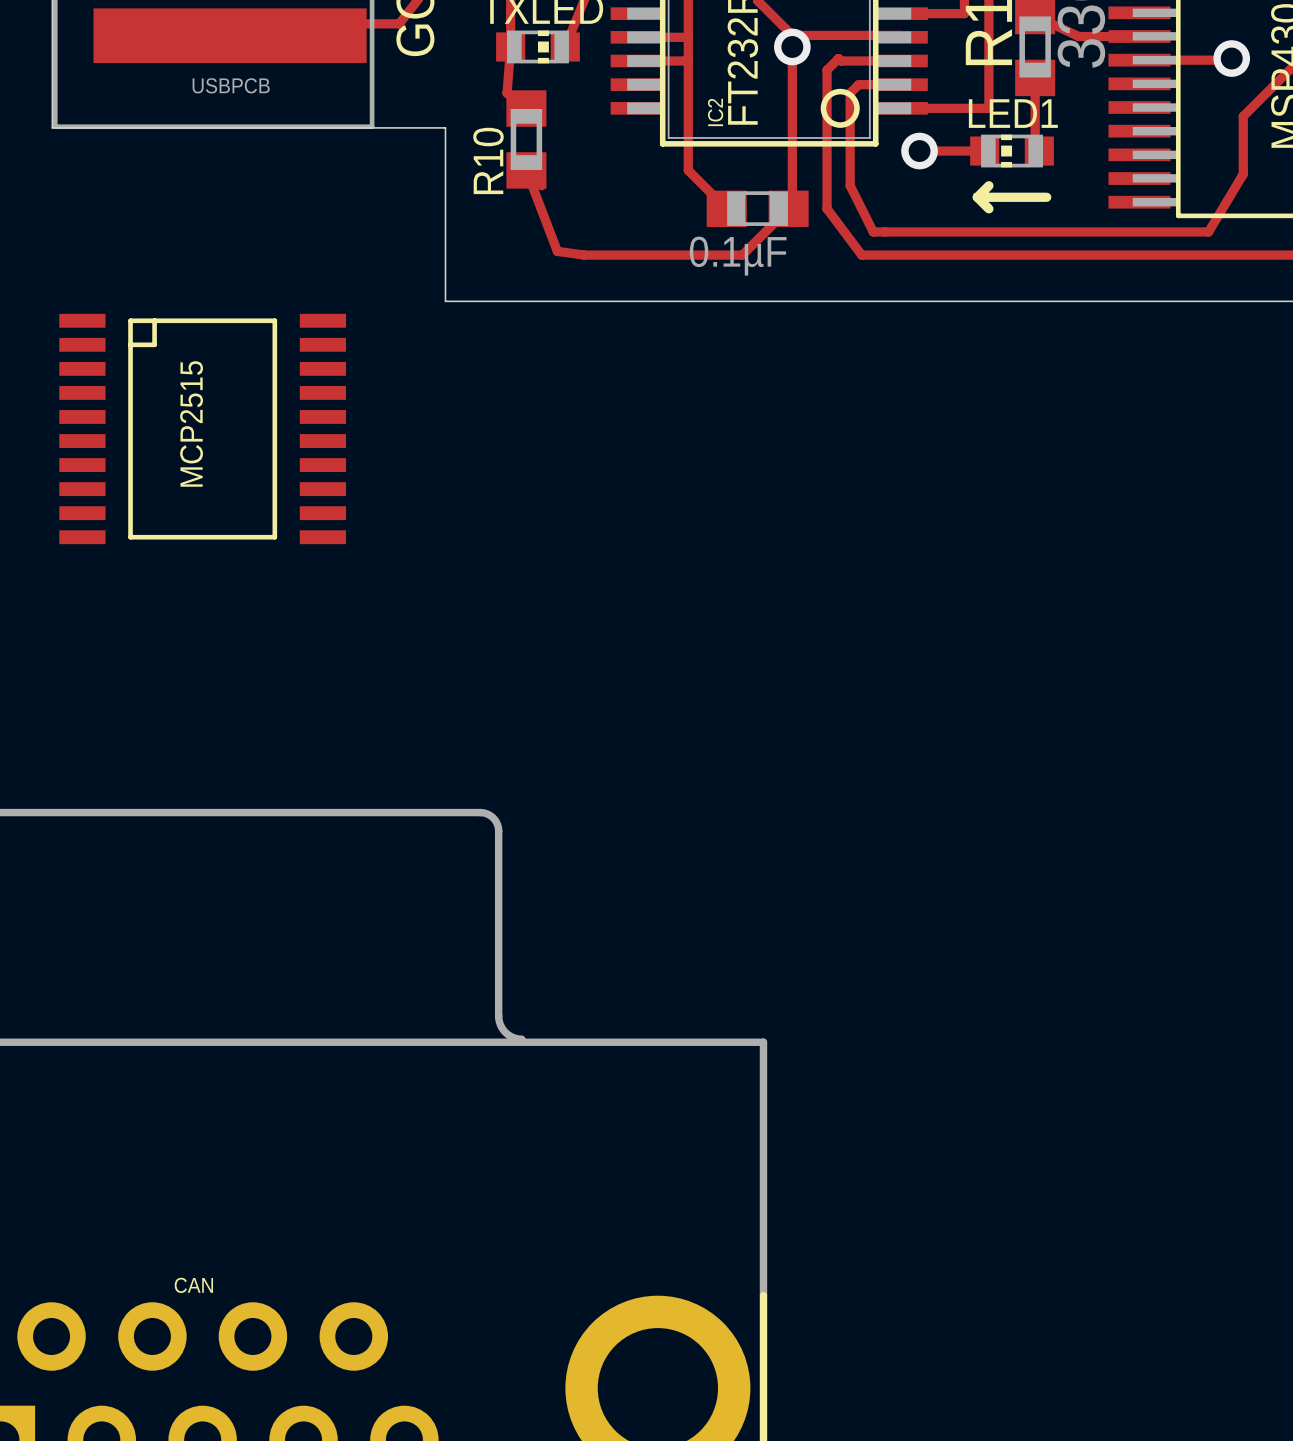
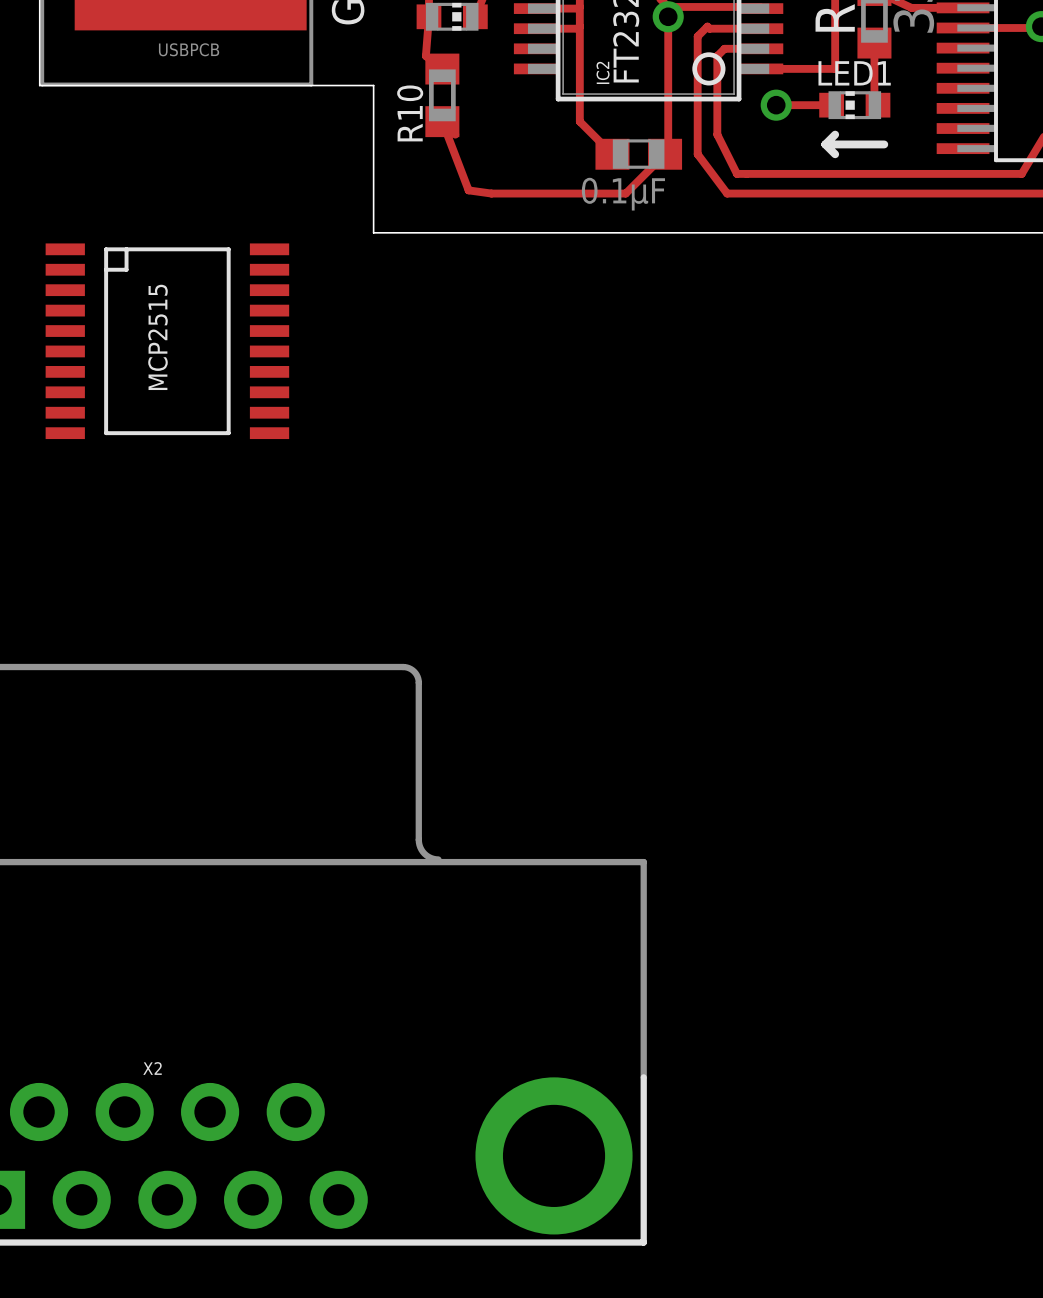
CAN name: CAN (193, 1285) -> X2 (152, 1068)

